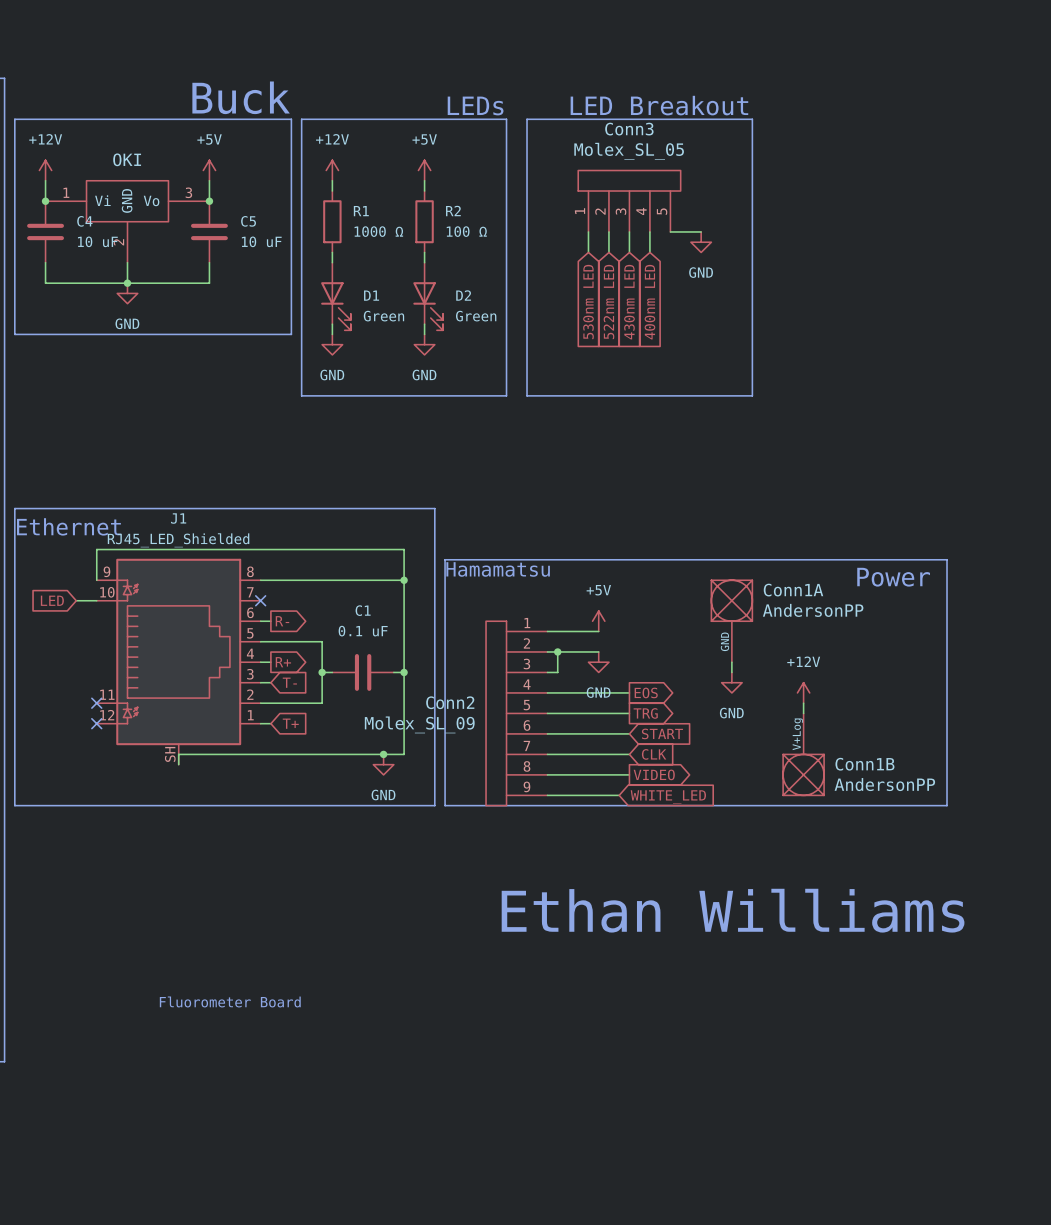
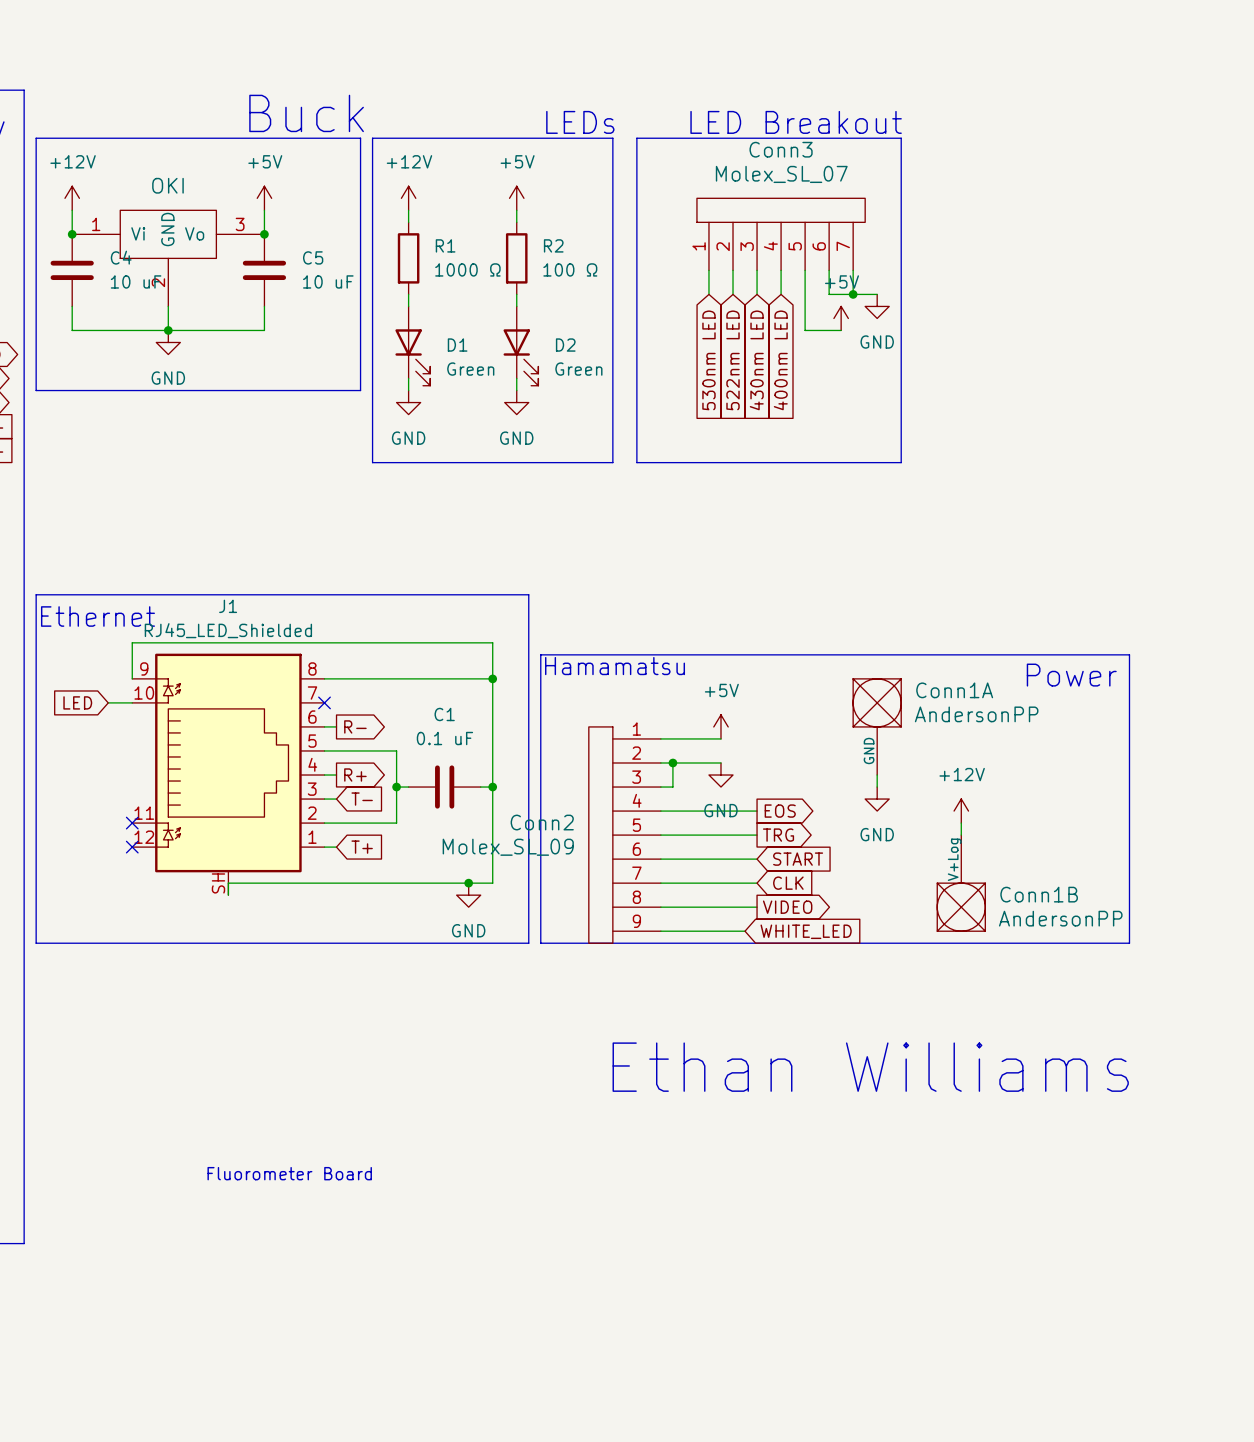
Conn3 value: Molex_SL_05 (629, 151) -> Molex_SL_07 (781, 174)
Conn3 symbol: [578, 170, 681, 232] -> [696, 198, 866, 271]
wire: (670, 231) (701, 231) -> (805, 270) (805, 330) (841, 330)
wire: none -> (829, 270) (829, 294) (877, 294)
wire: none -> (853, 270) (853, 294)
power symbol position: GND (701, 242) -> GND (877, 306)
junction: none -> (853, 294)
power symbol: none -> +5V (841, 318)

